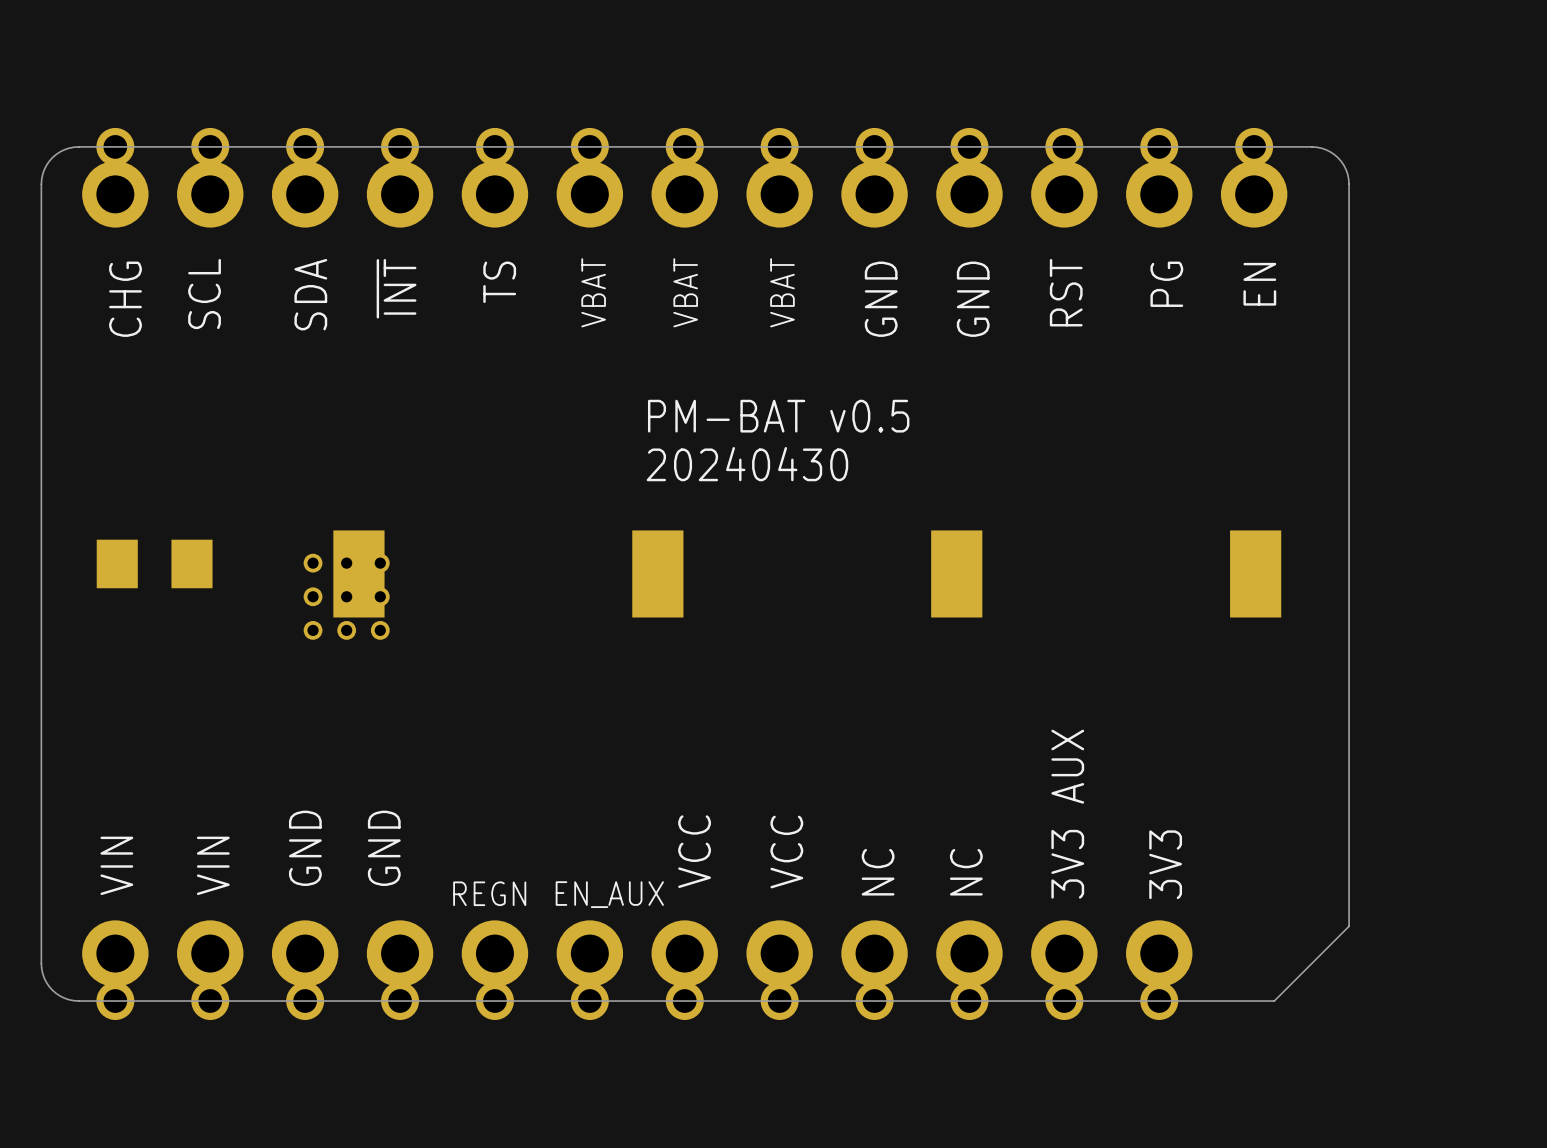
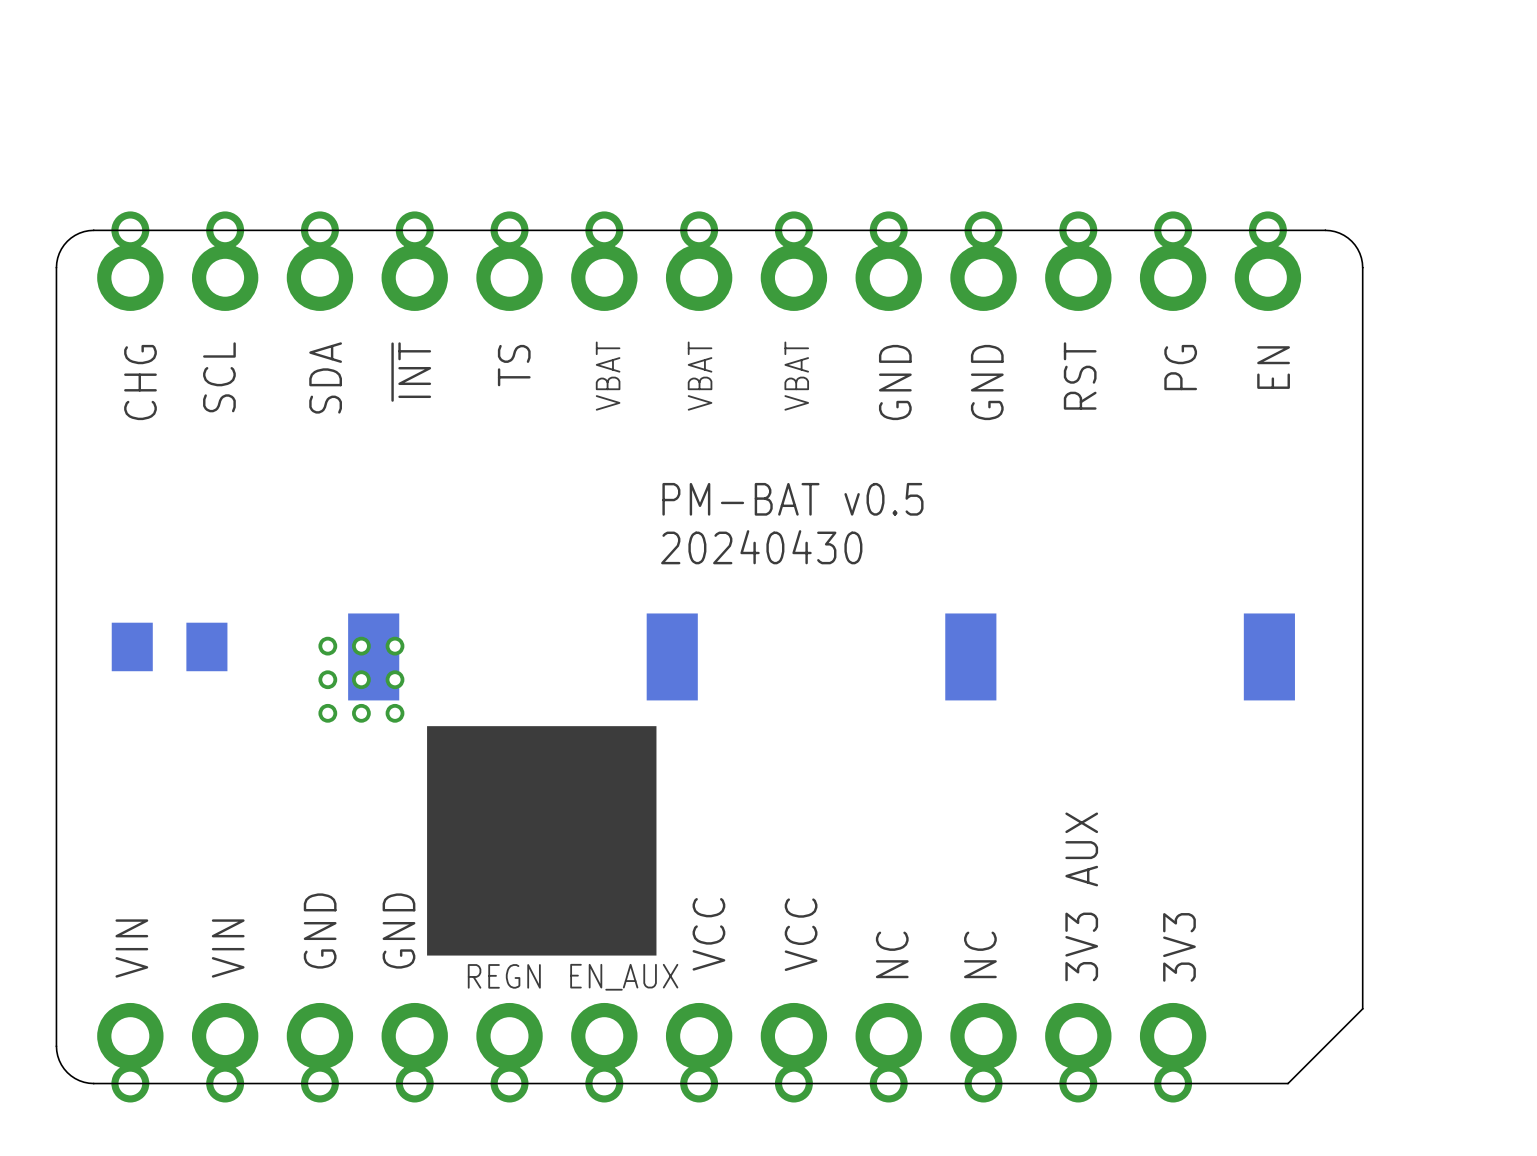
drawing: none -> [427, 726, 657, 956]

